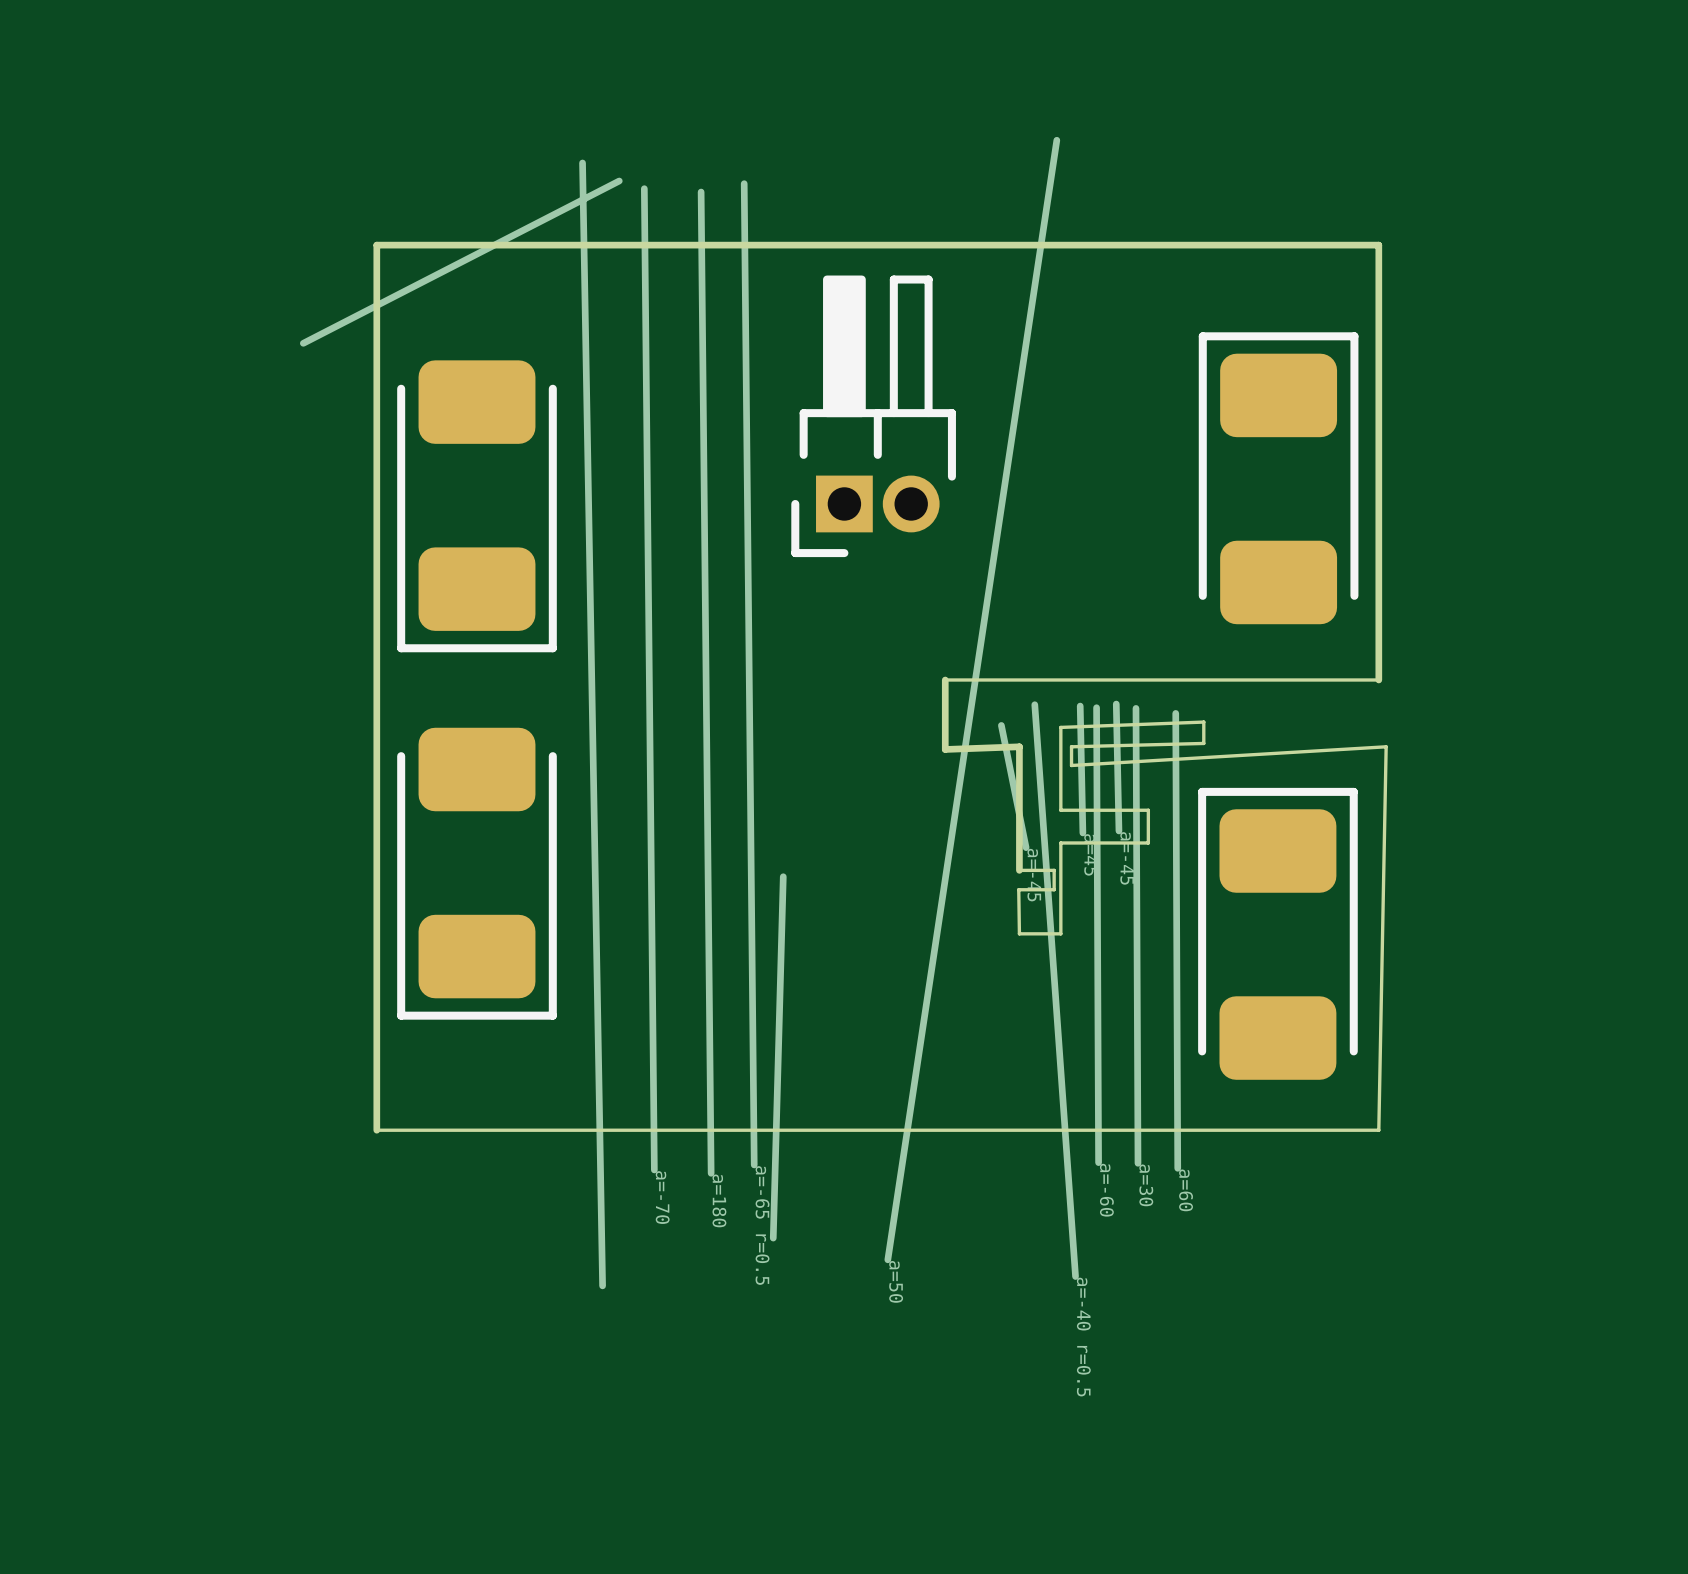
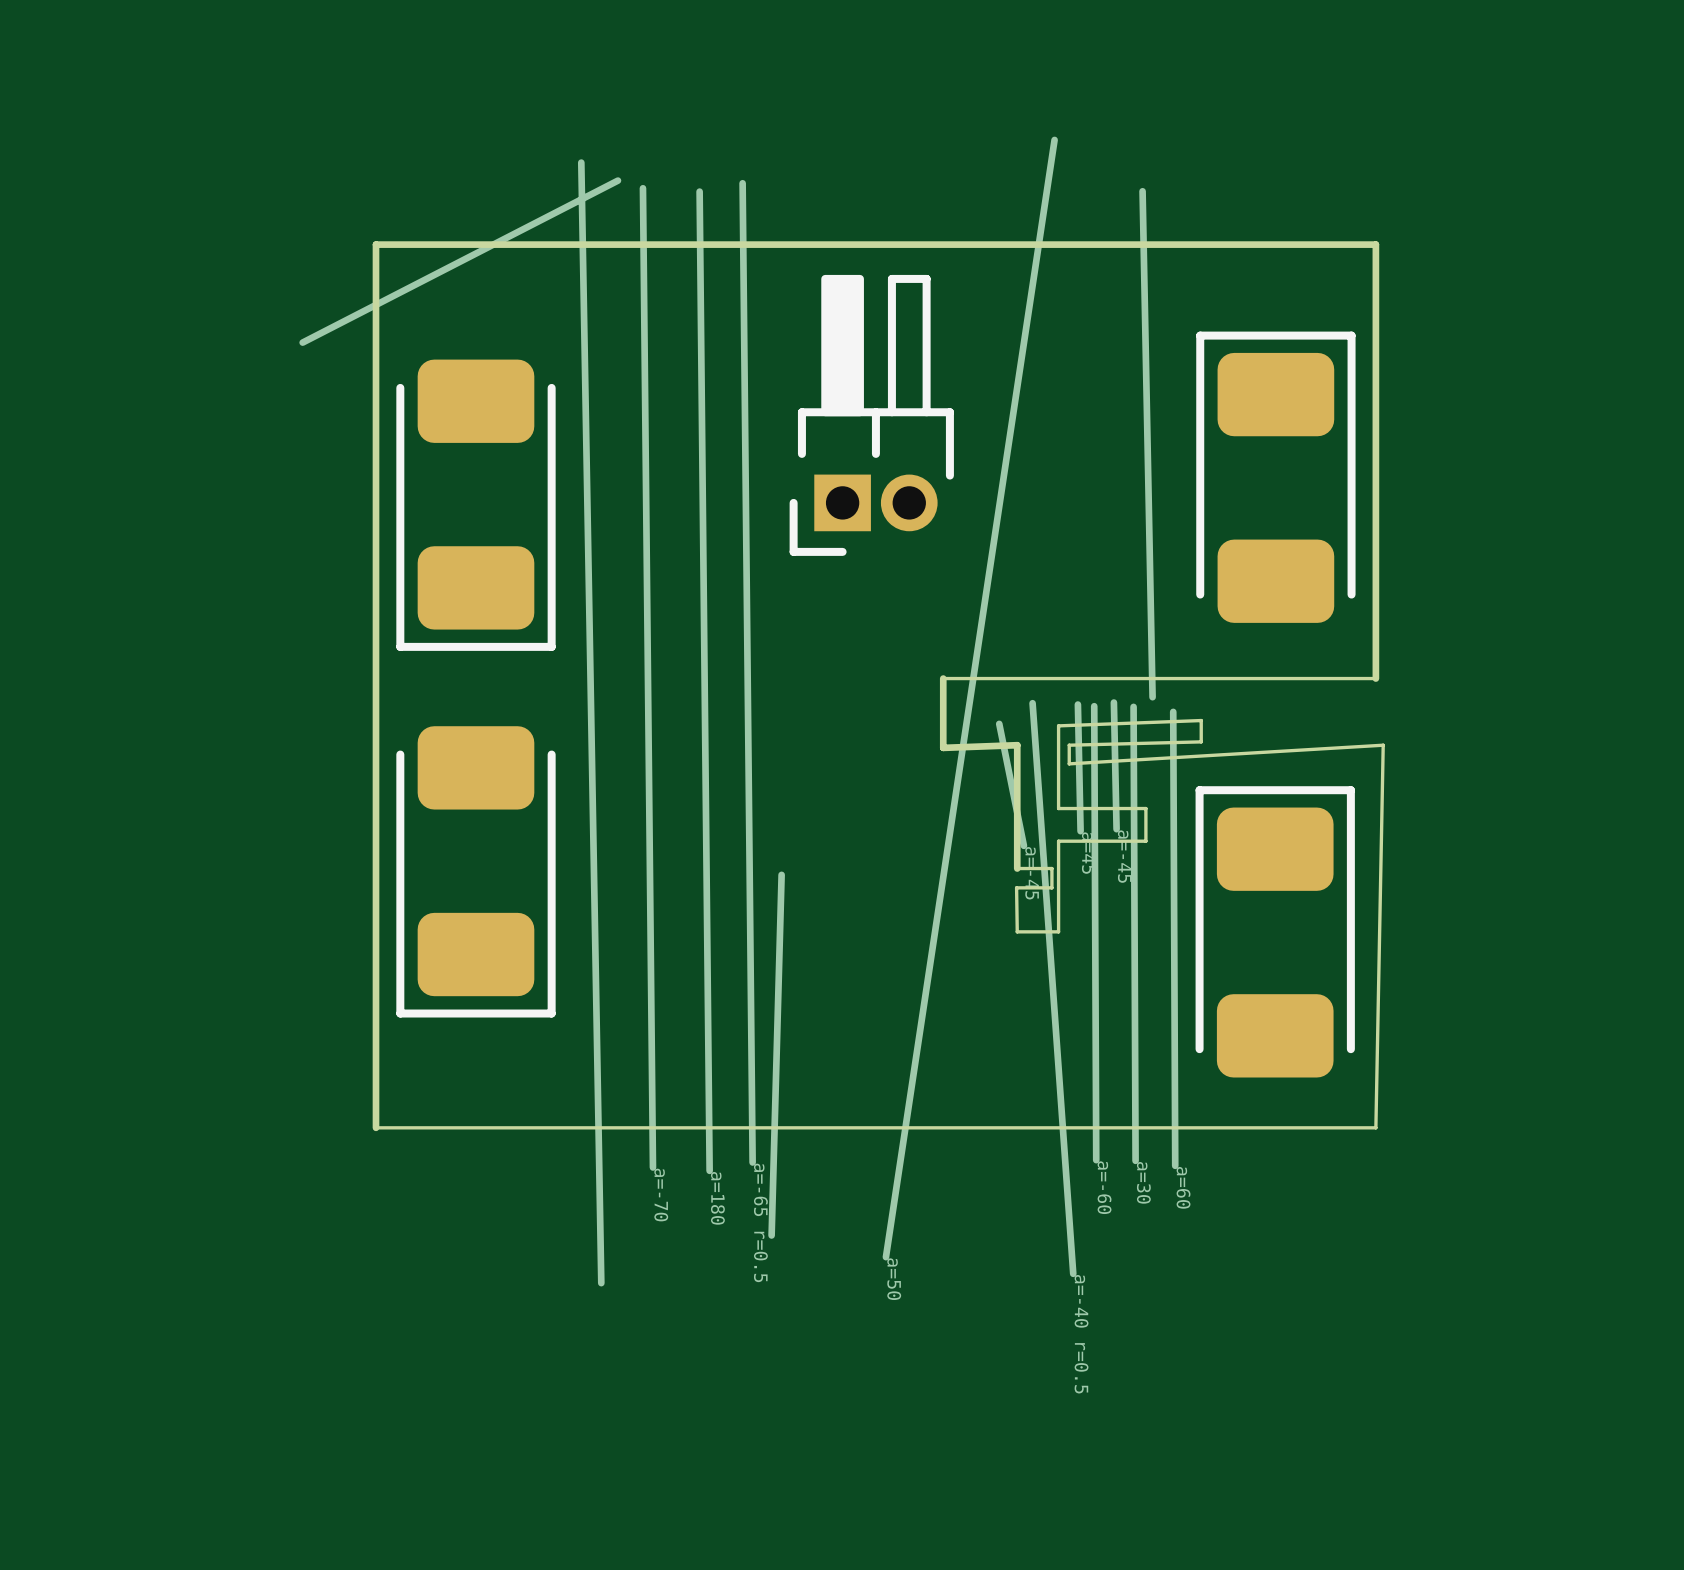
line: none -> (1142, 191) (1152, 697)

